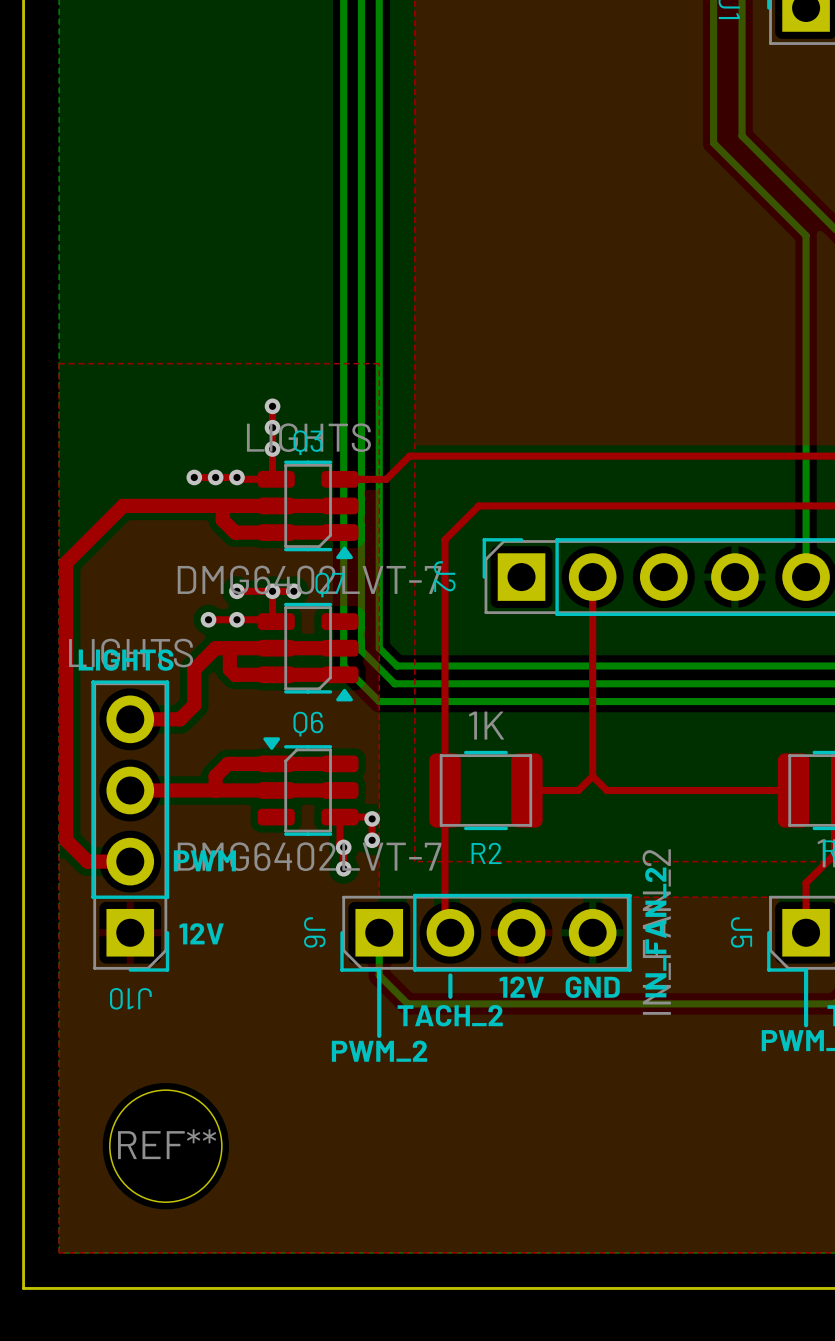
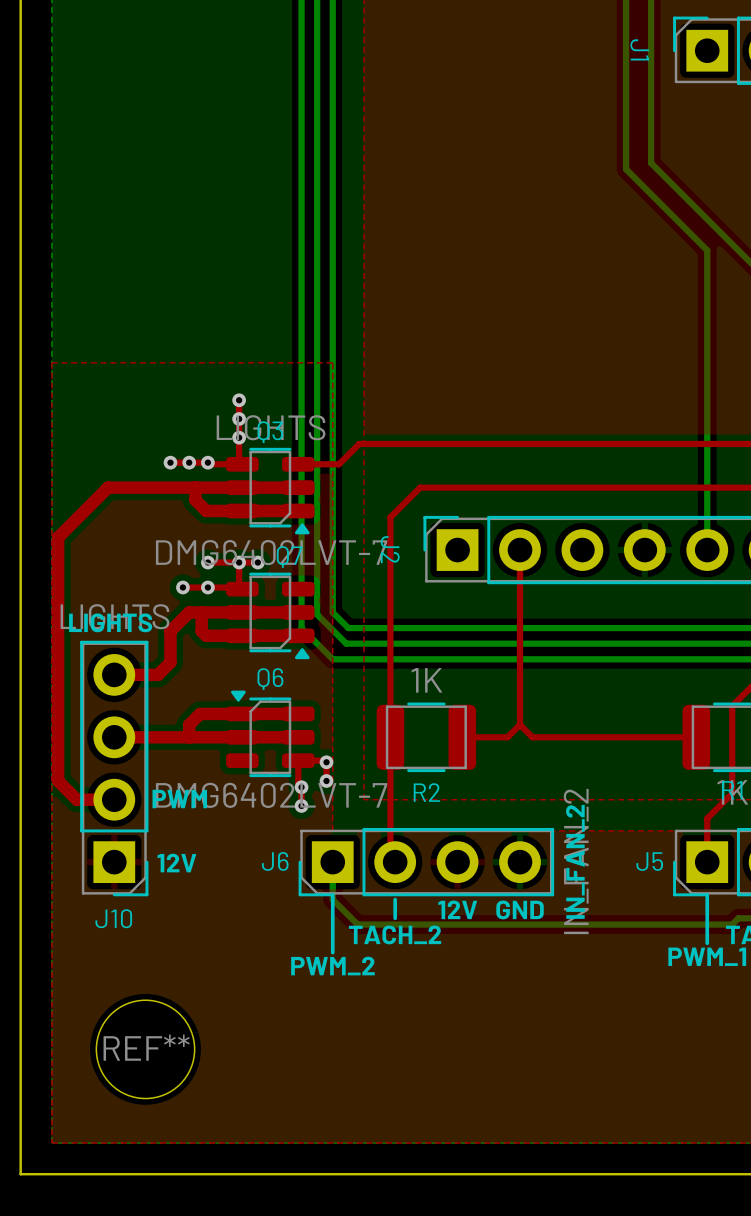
J6 name rotation: 0° (314, 932) -> 90° counterclockwise (275, 861)
J5 name rotation: 0° (741, 932) -> 90° counterclockwise (649, 861)
J10 name rotation: 0° (130, 998) -> 180° (113, 918)

